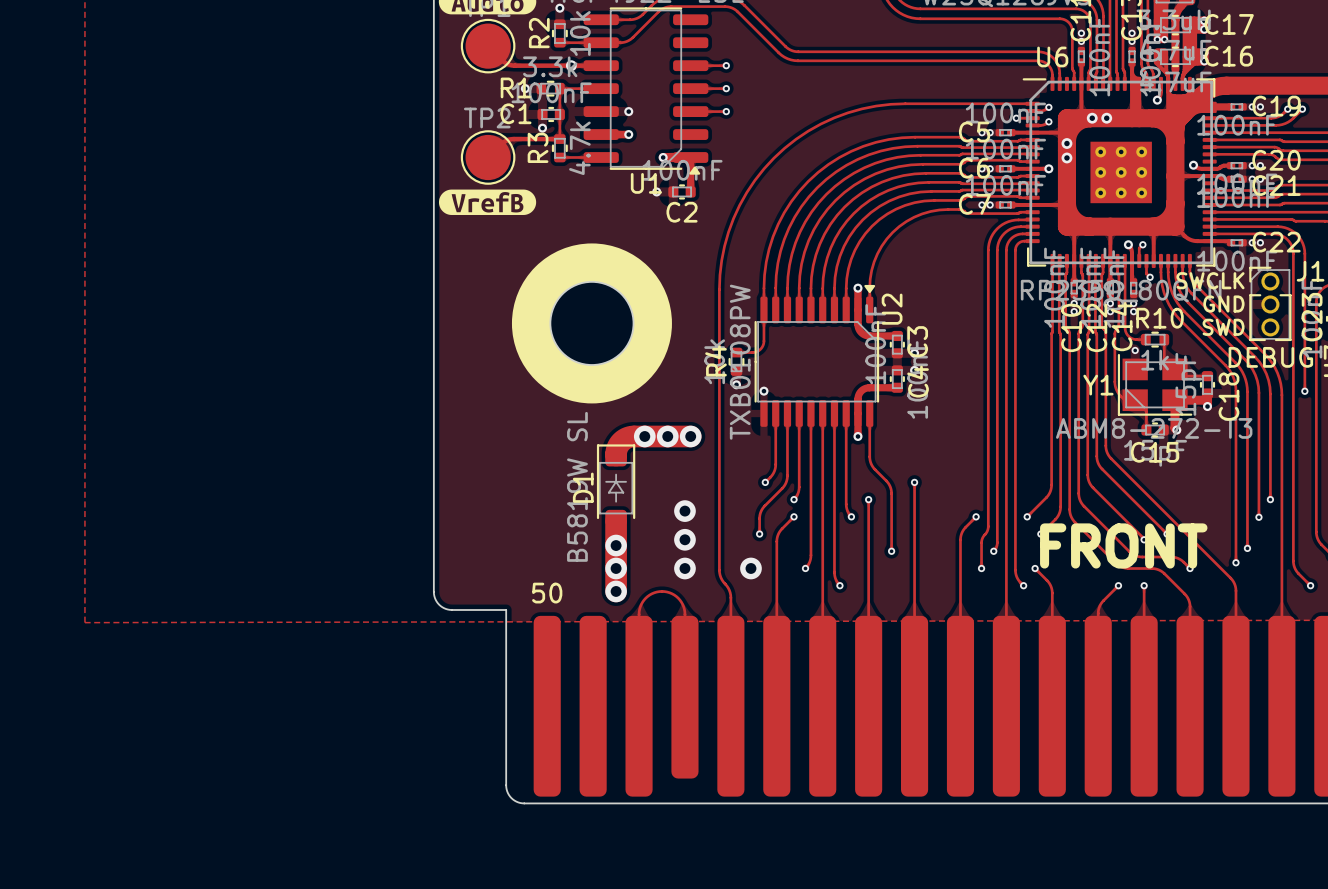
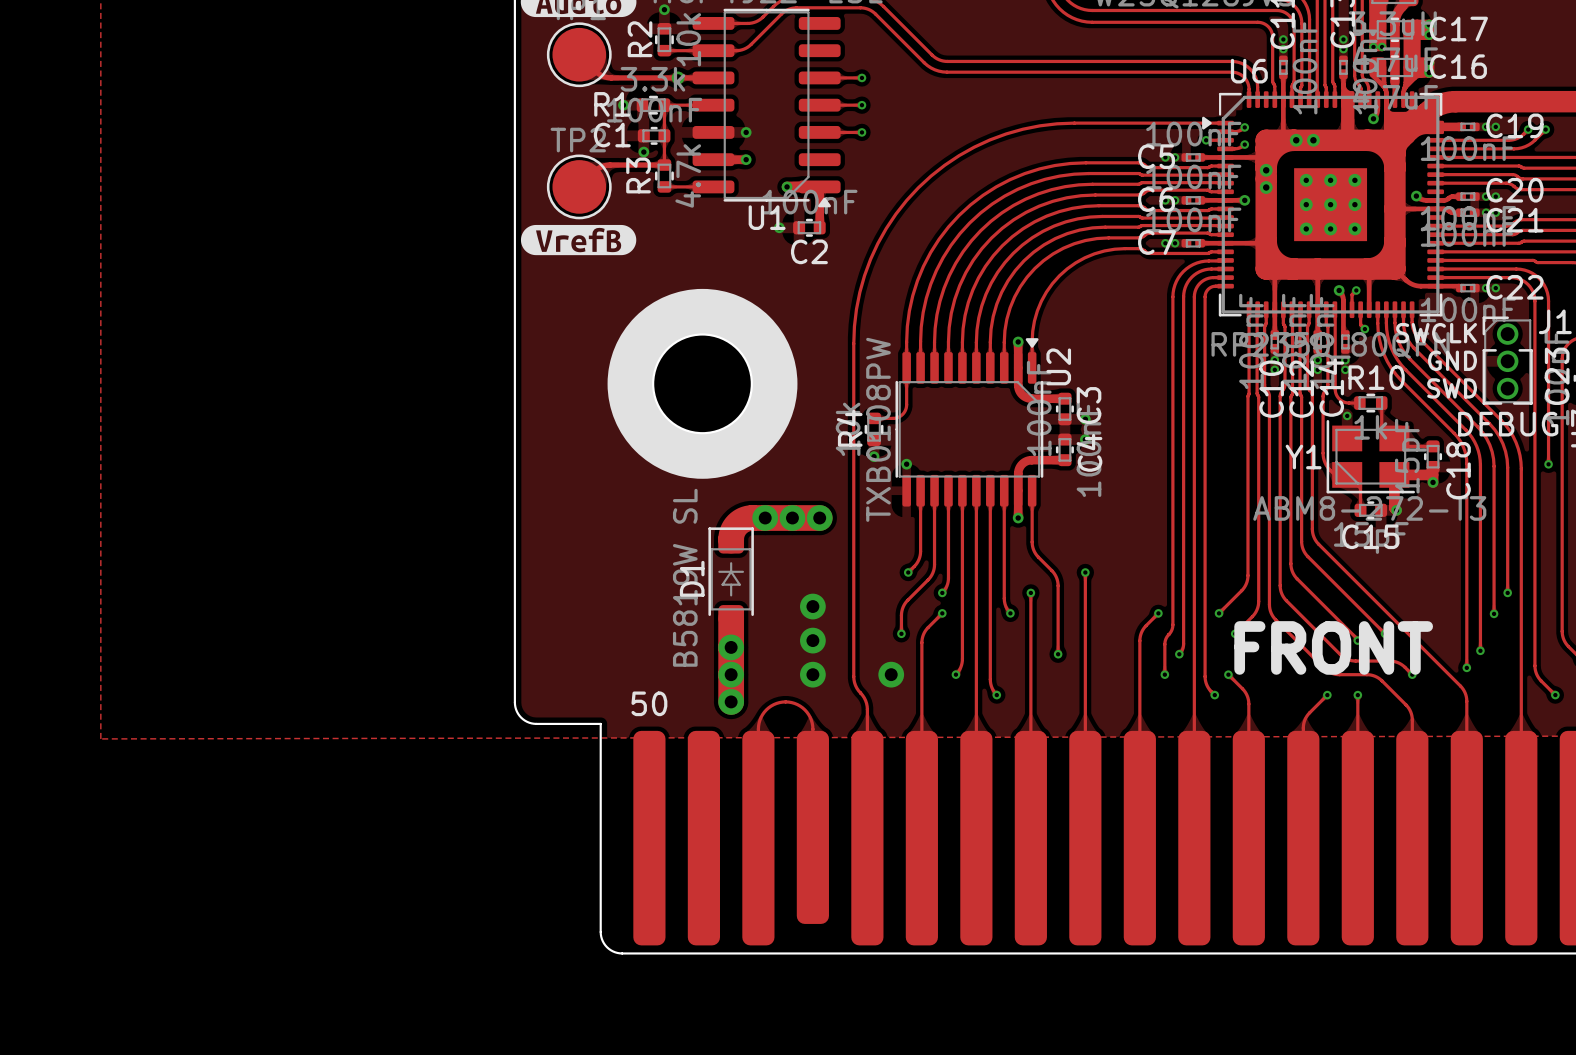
U6 footprint: [1022, 76, 1217, 269] -> [1202, 91, 1445, 319]

